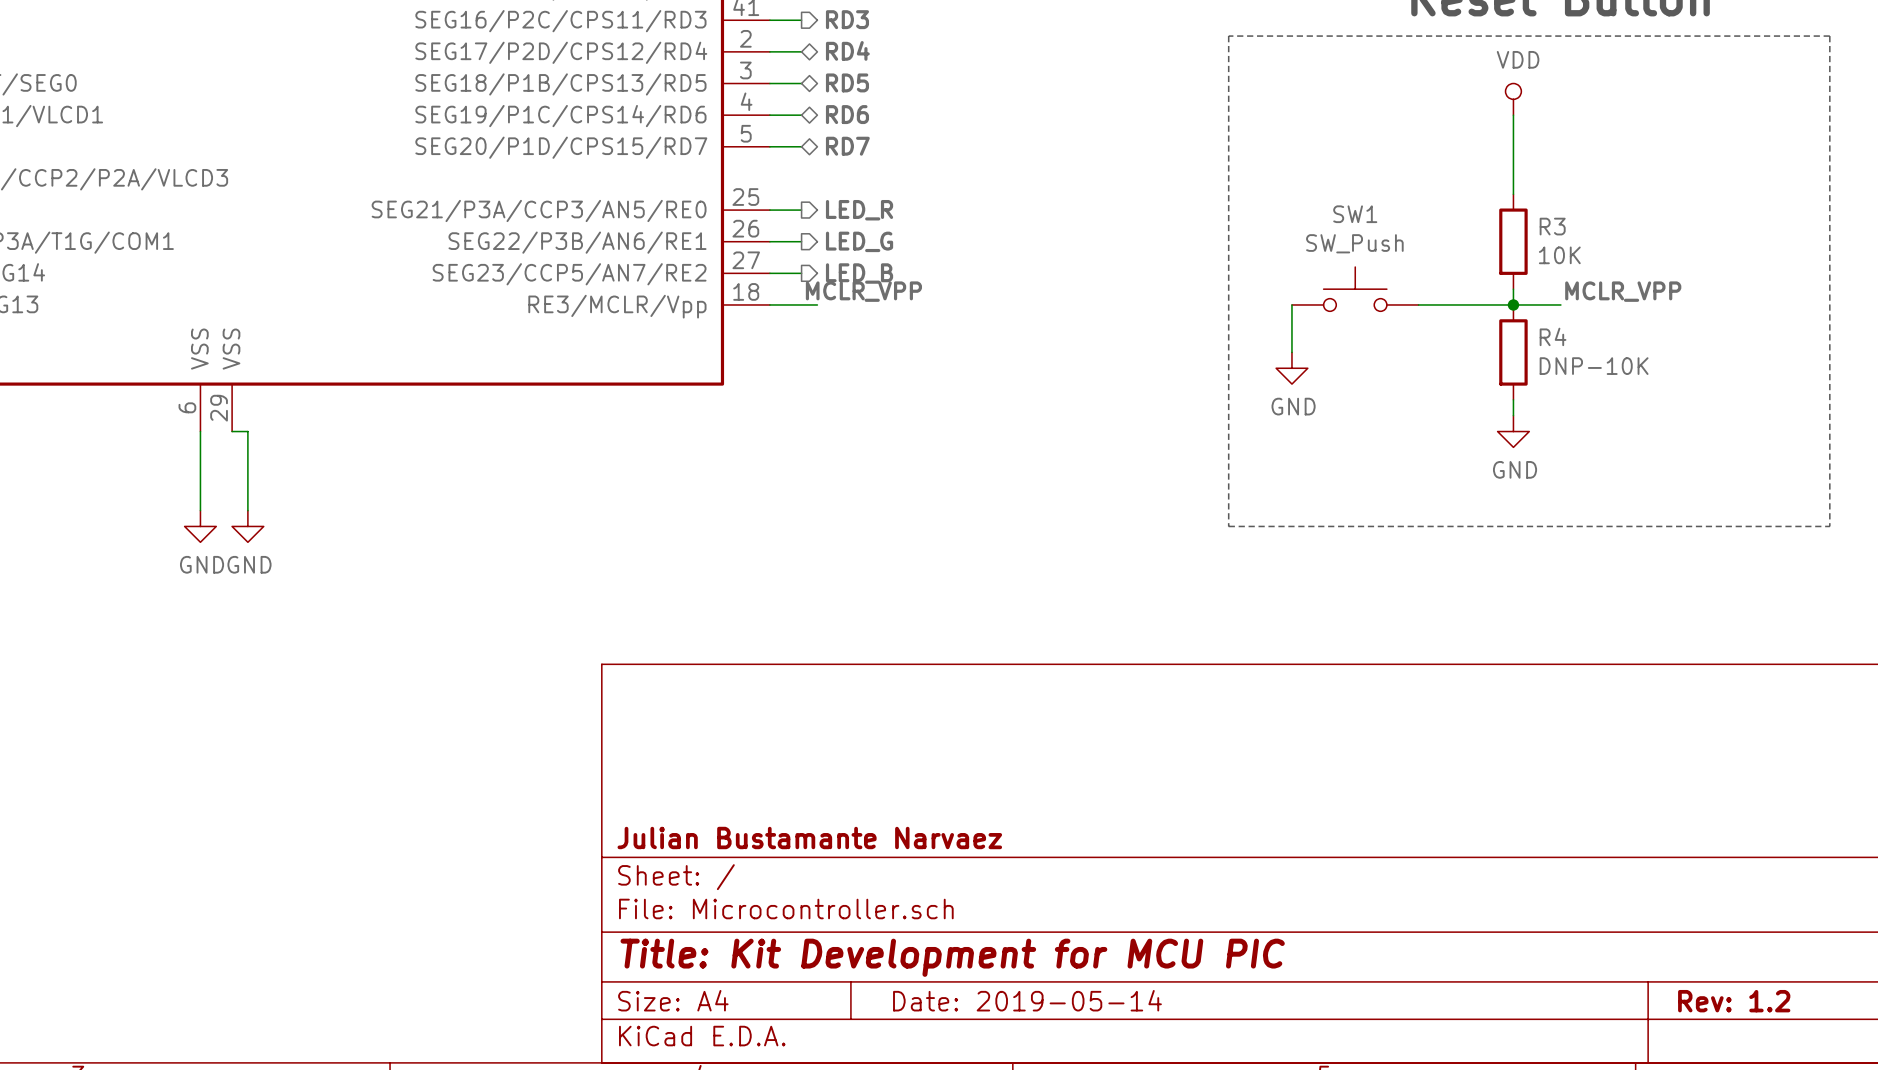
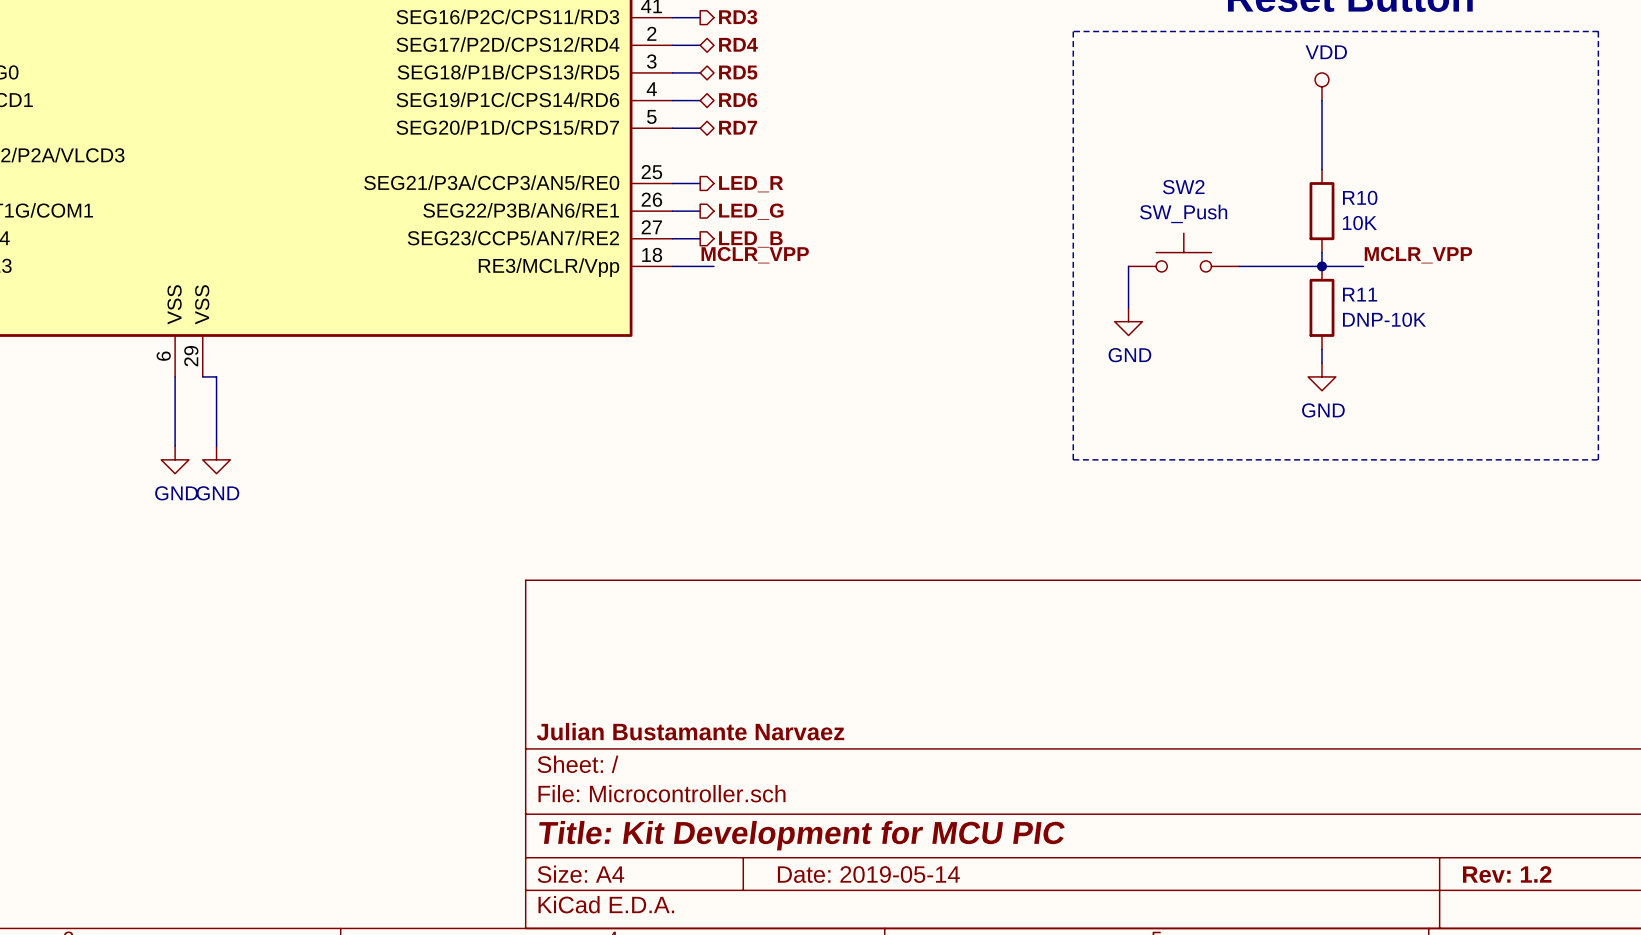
SW1 name: SW1 (1355, 214) -> SW2 (1183, 187)
R3 name: R3 (1552, 226) -> R10 (1360, 197)
R4 name: R4 (1553, 336) -> R11 (1360, 294)

